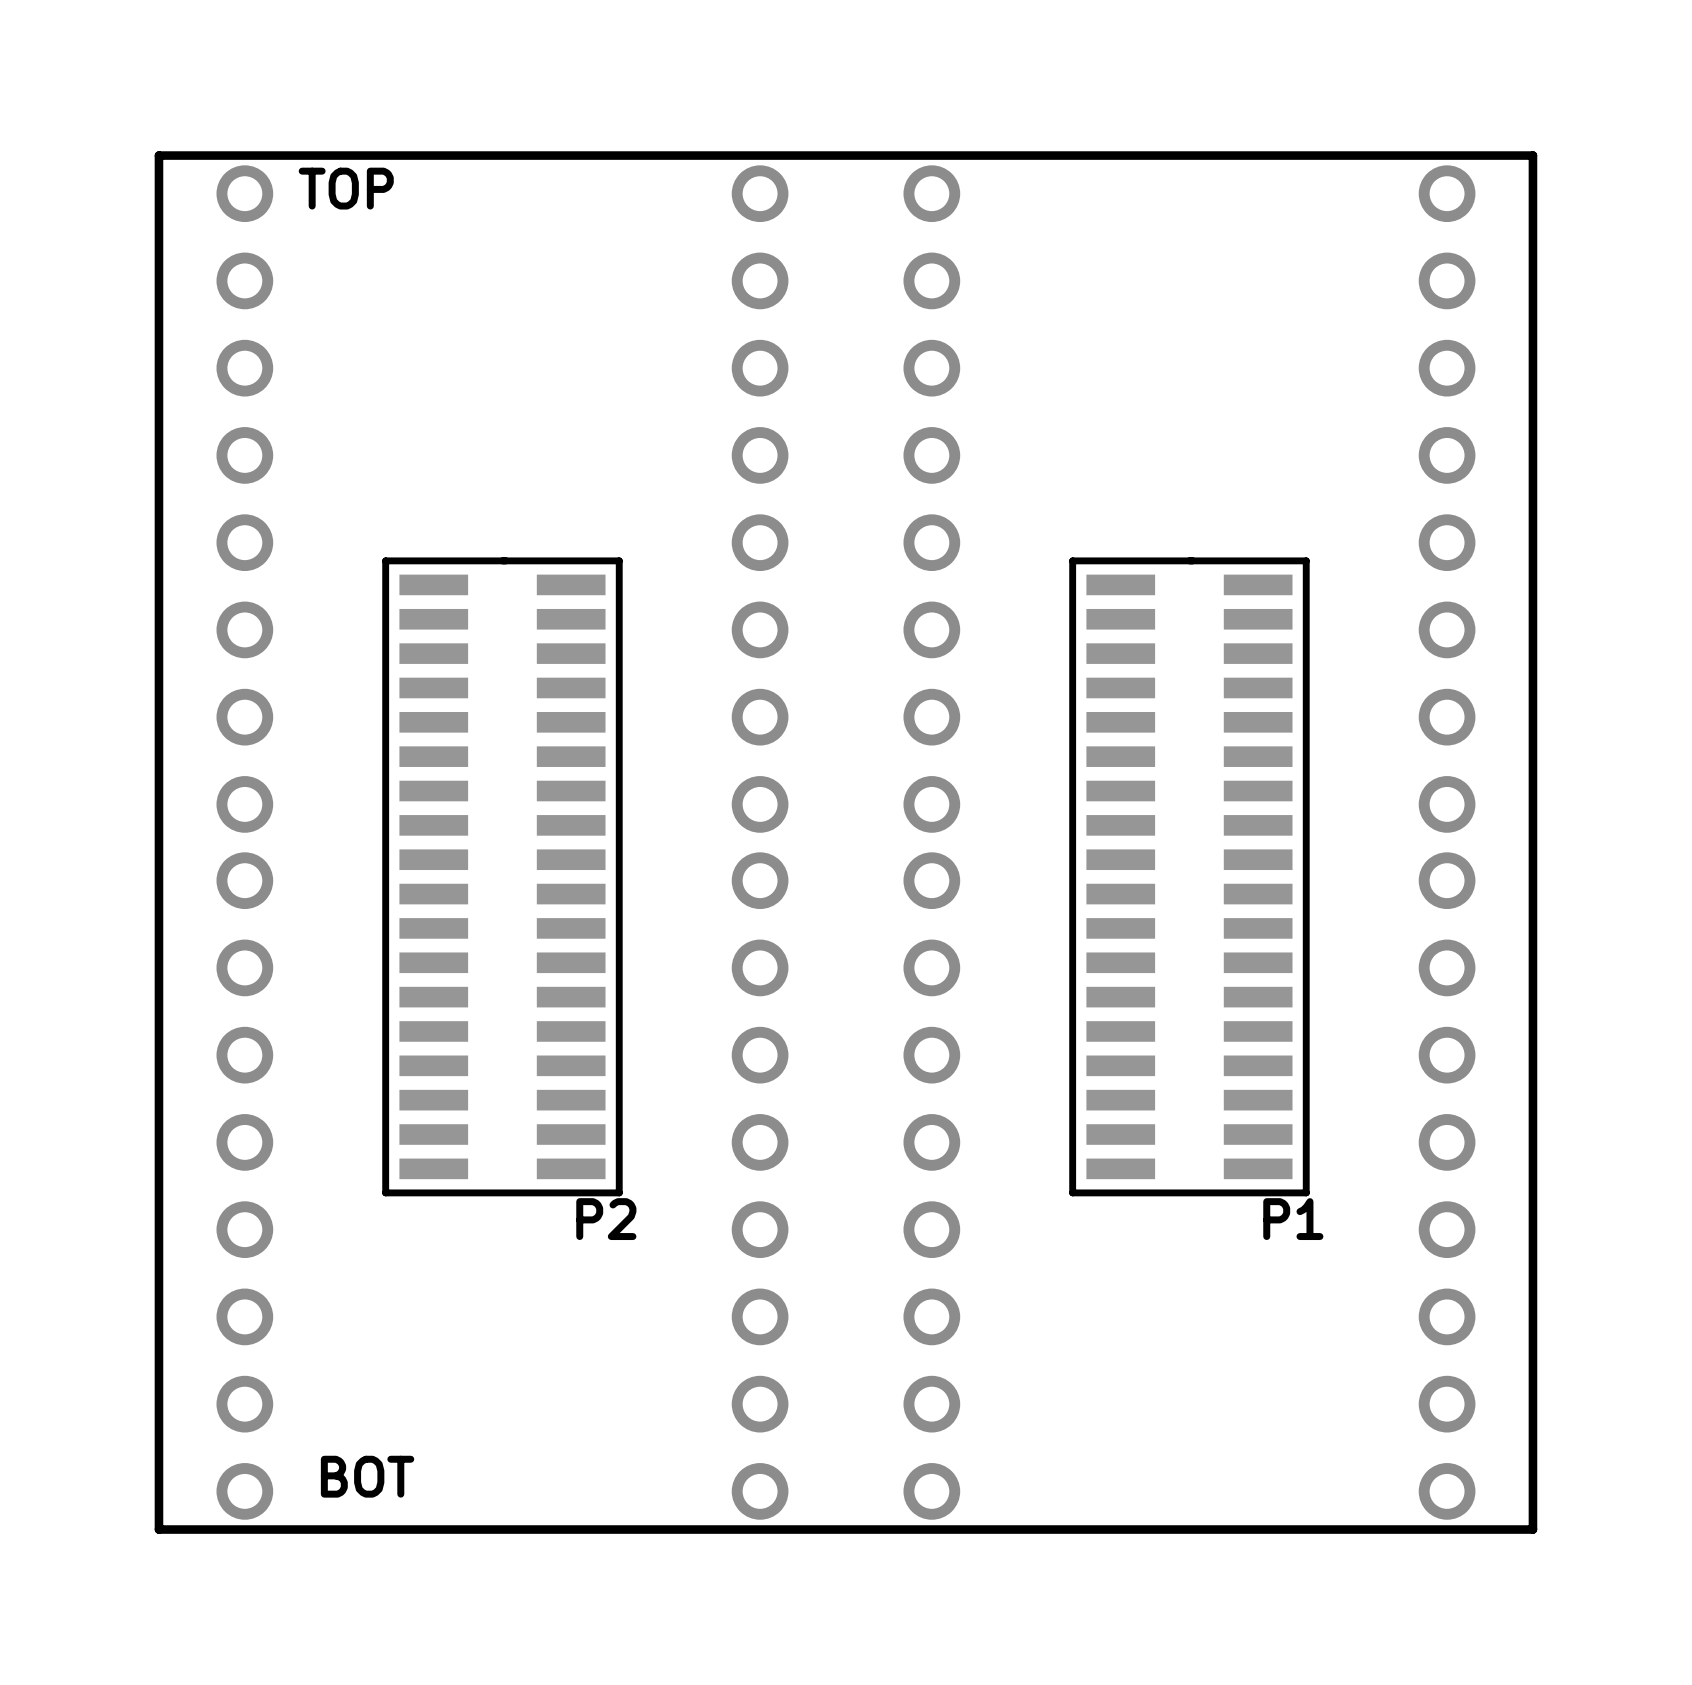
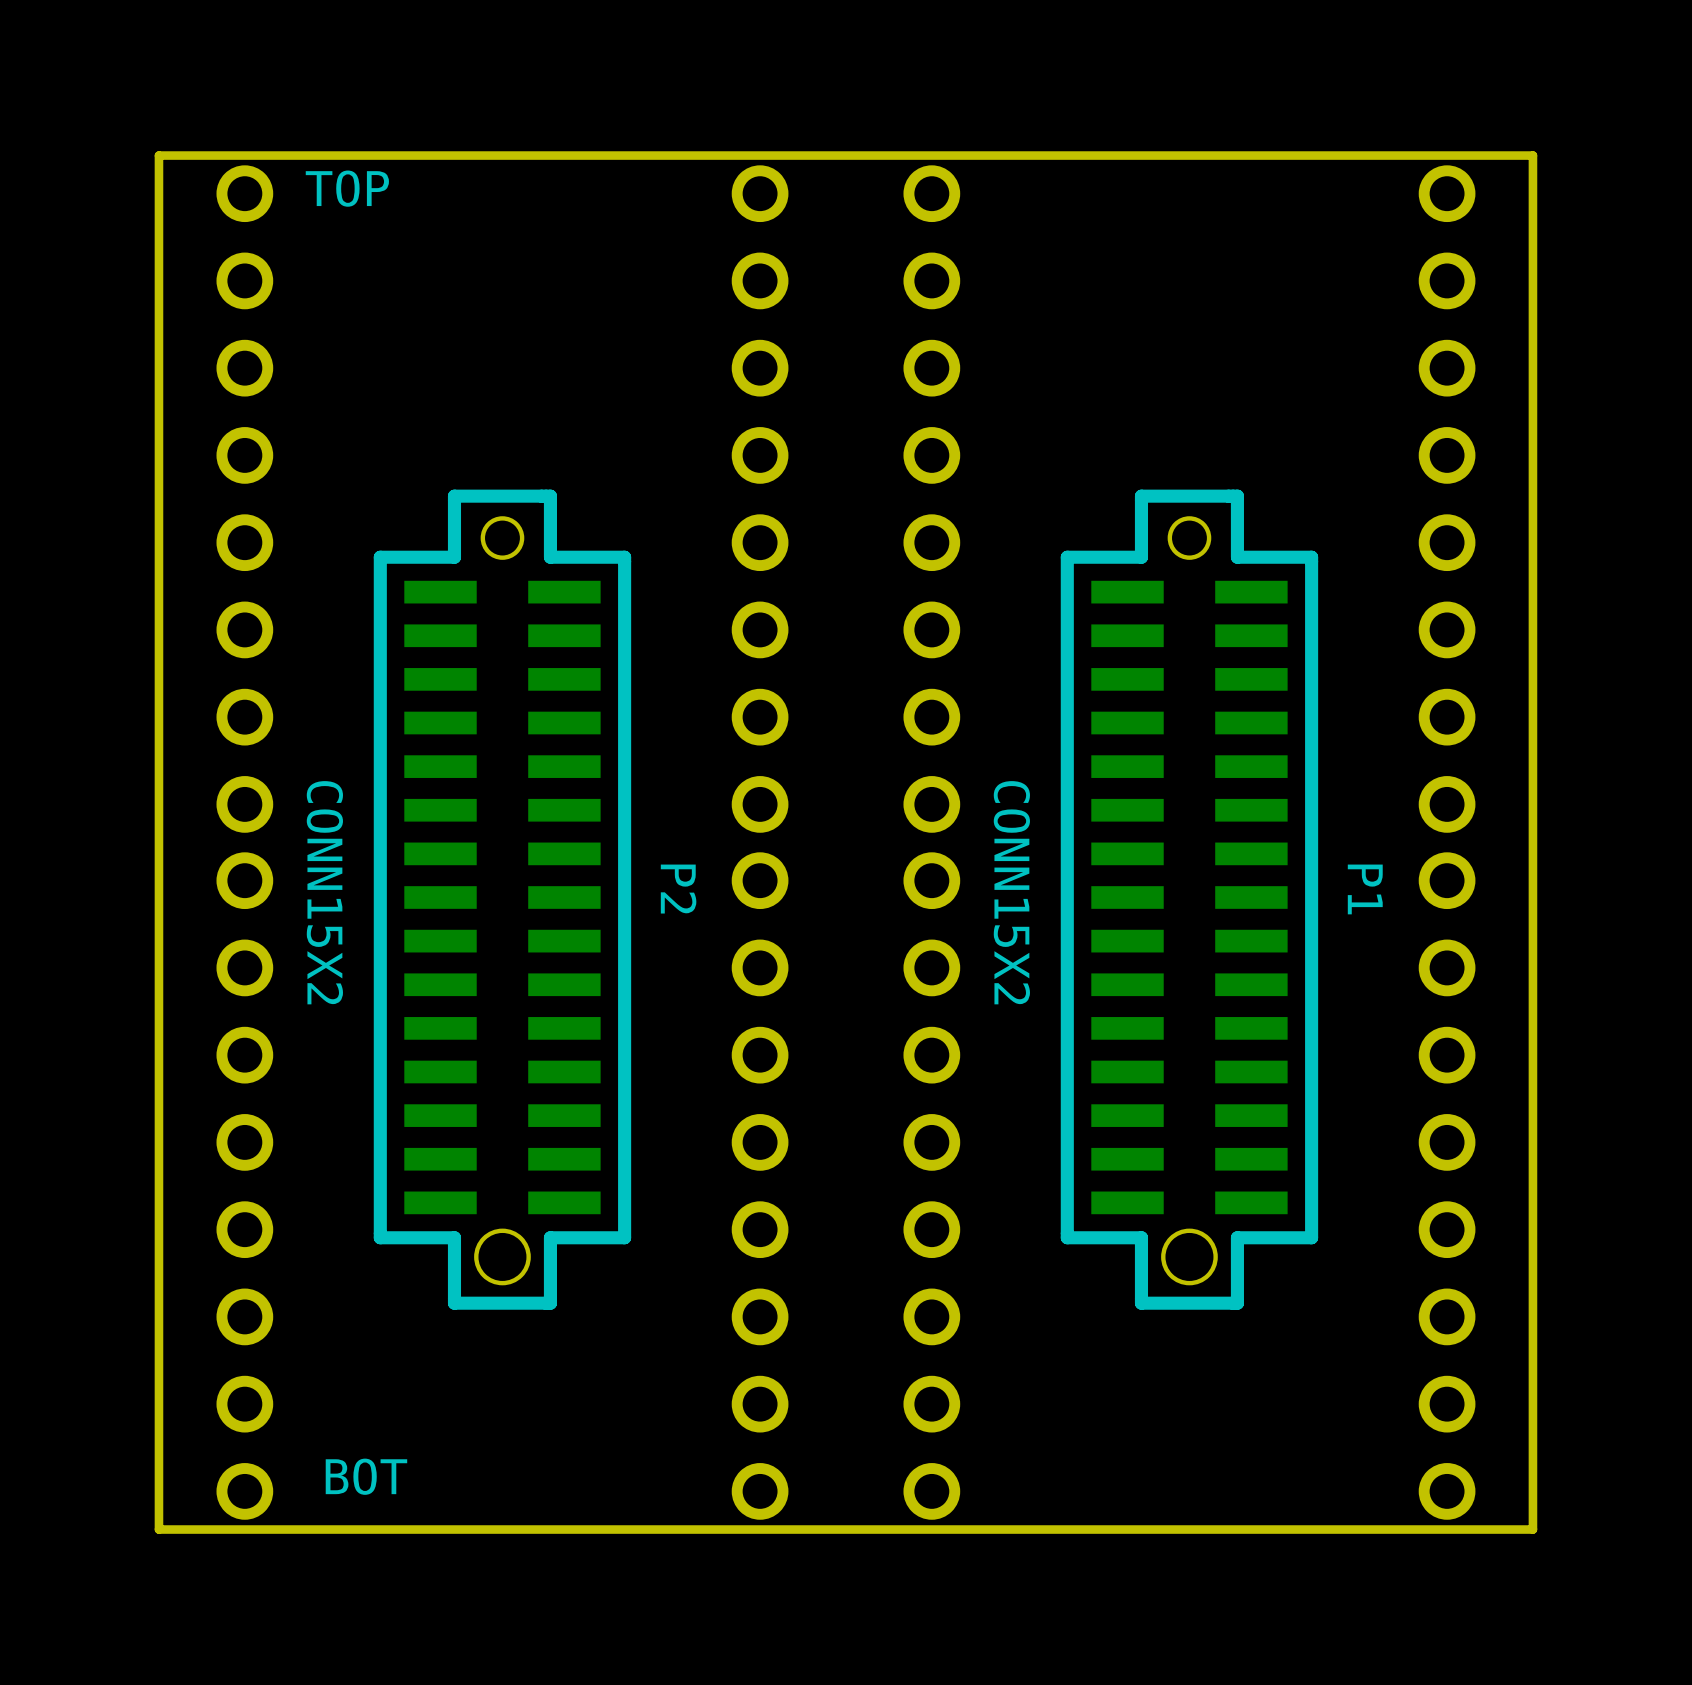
P2 footprint: [382, 557, 623, 1197] -> [373, 489, 632, 1310]
P1 footprint: [1069, 557, 1310, 1197] -> [1060, 489, 1319, 1310]
P2 value: none -> CONN15X2 (324, 892)
P1 value: none -> CONN15X2 (1011, 892)
P2 name position: P2 (606, 1219) -> P2 (678, 889)
P1 name position: P1 (1293, 1219) -> P1 (1365, 889)

